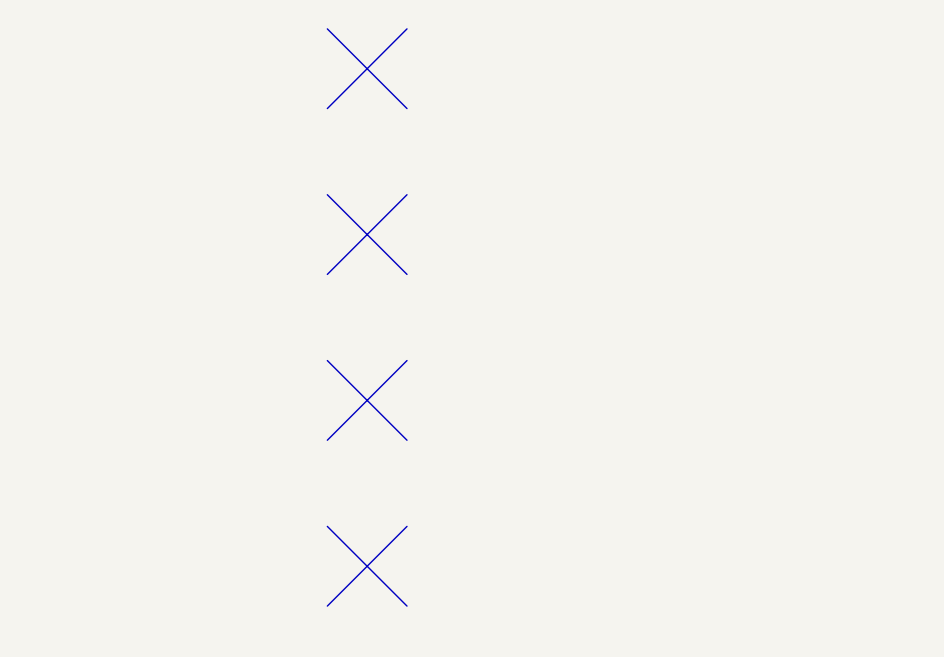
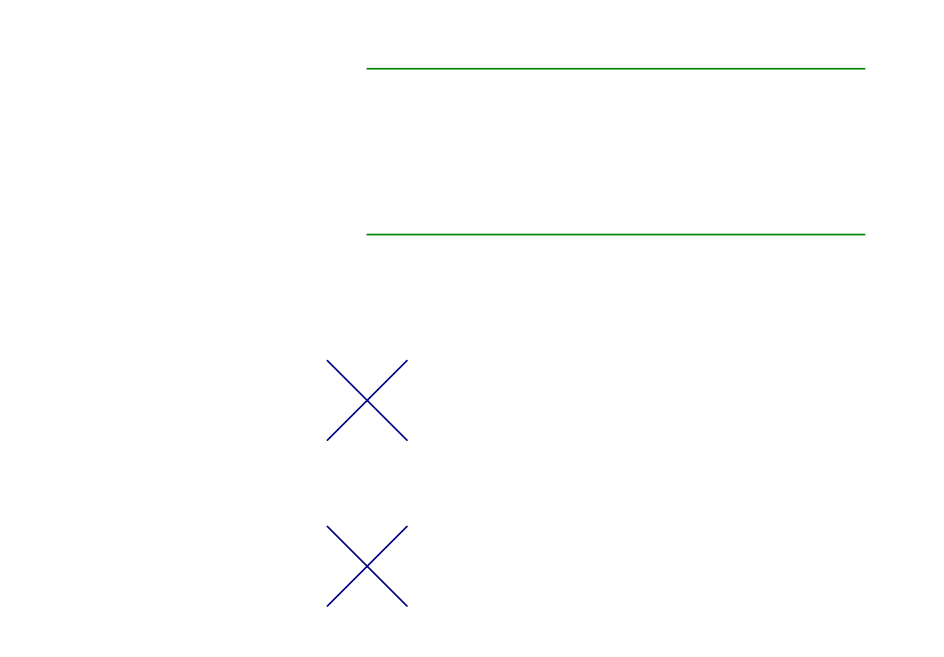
wire: none -> (367, 68) (864, 68)
no-connect mark: (367, 68) -> none
wire: none -> (367, 234) (864, 234)
no-connect mark: (367, 234) -> none

